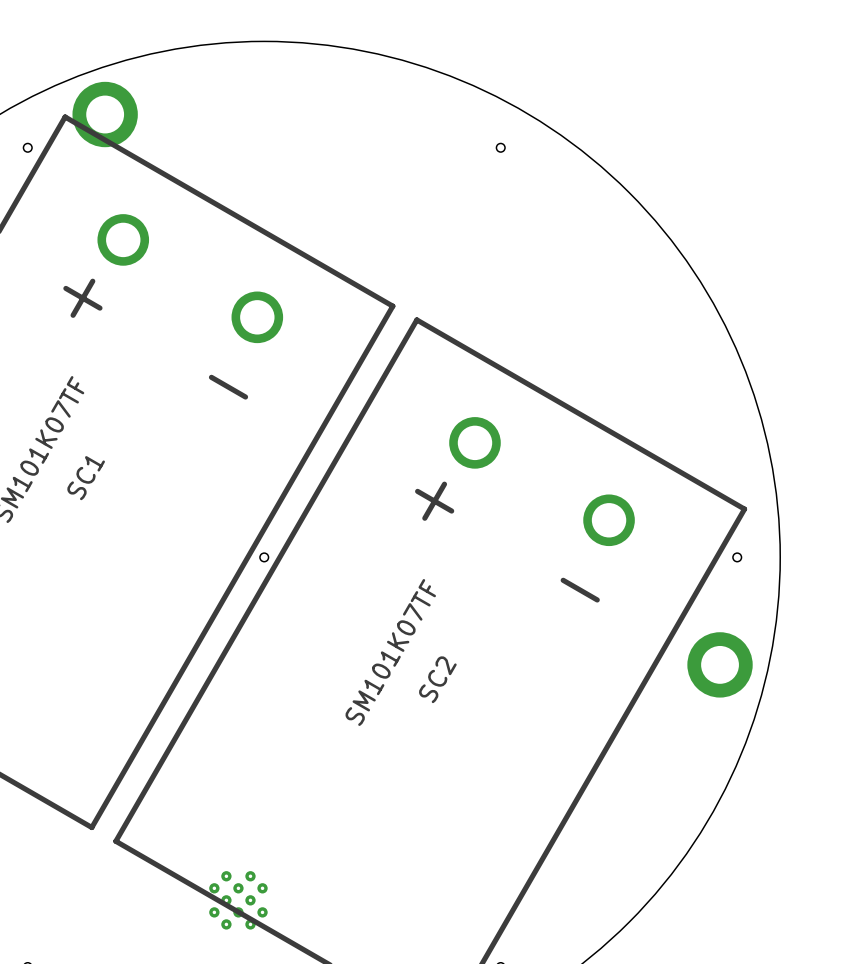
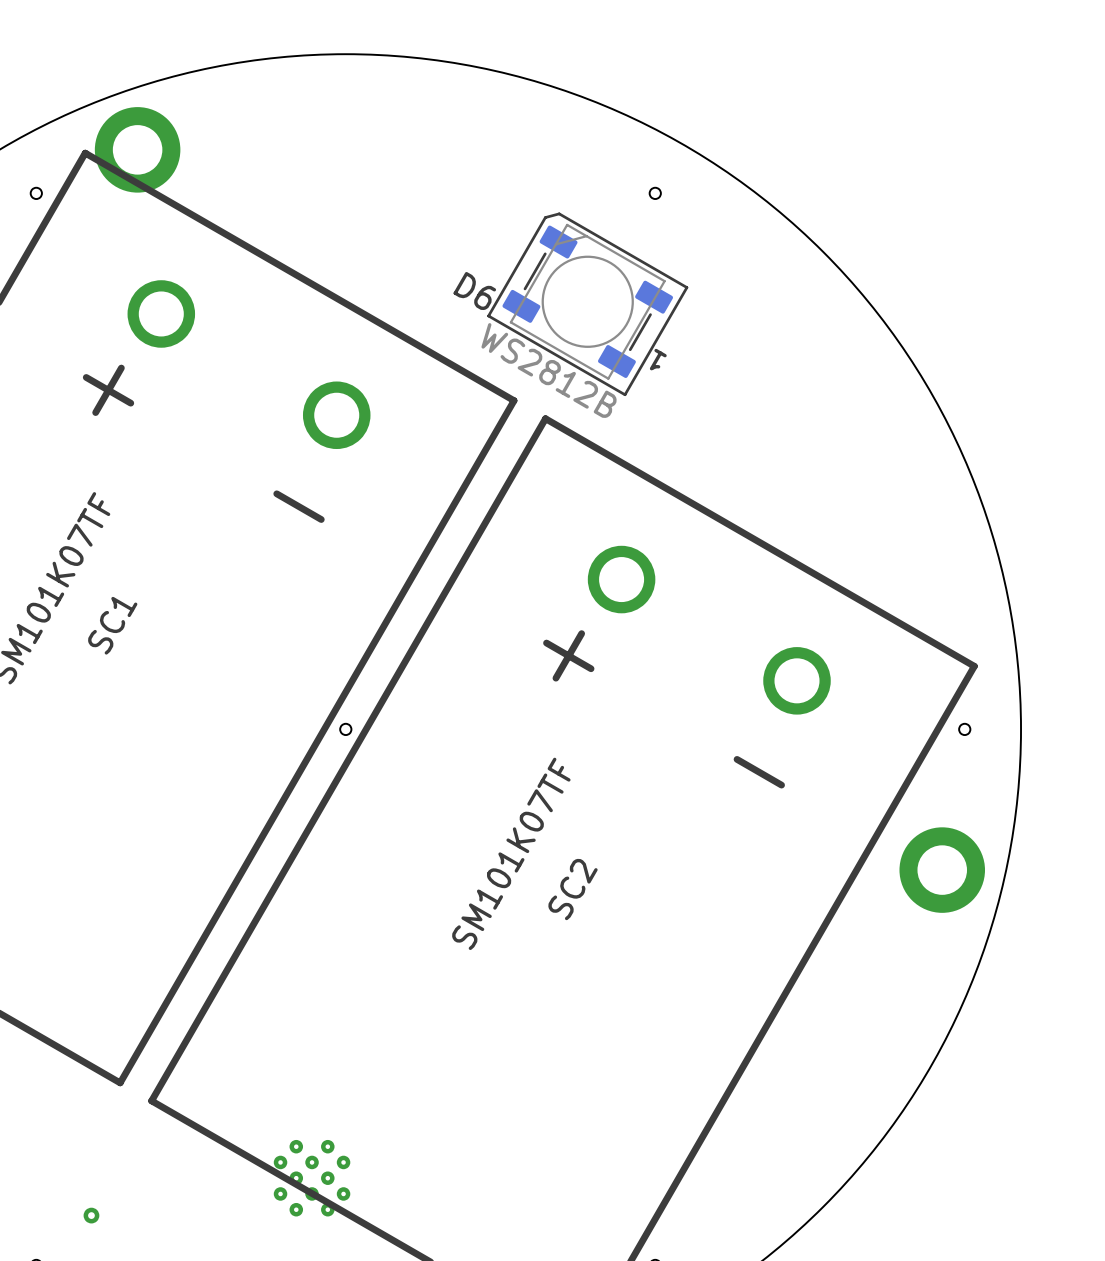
D6: none -> WS2812B (587, 304)
via: none -> (91, 1215)

